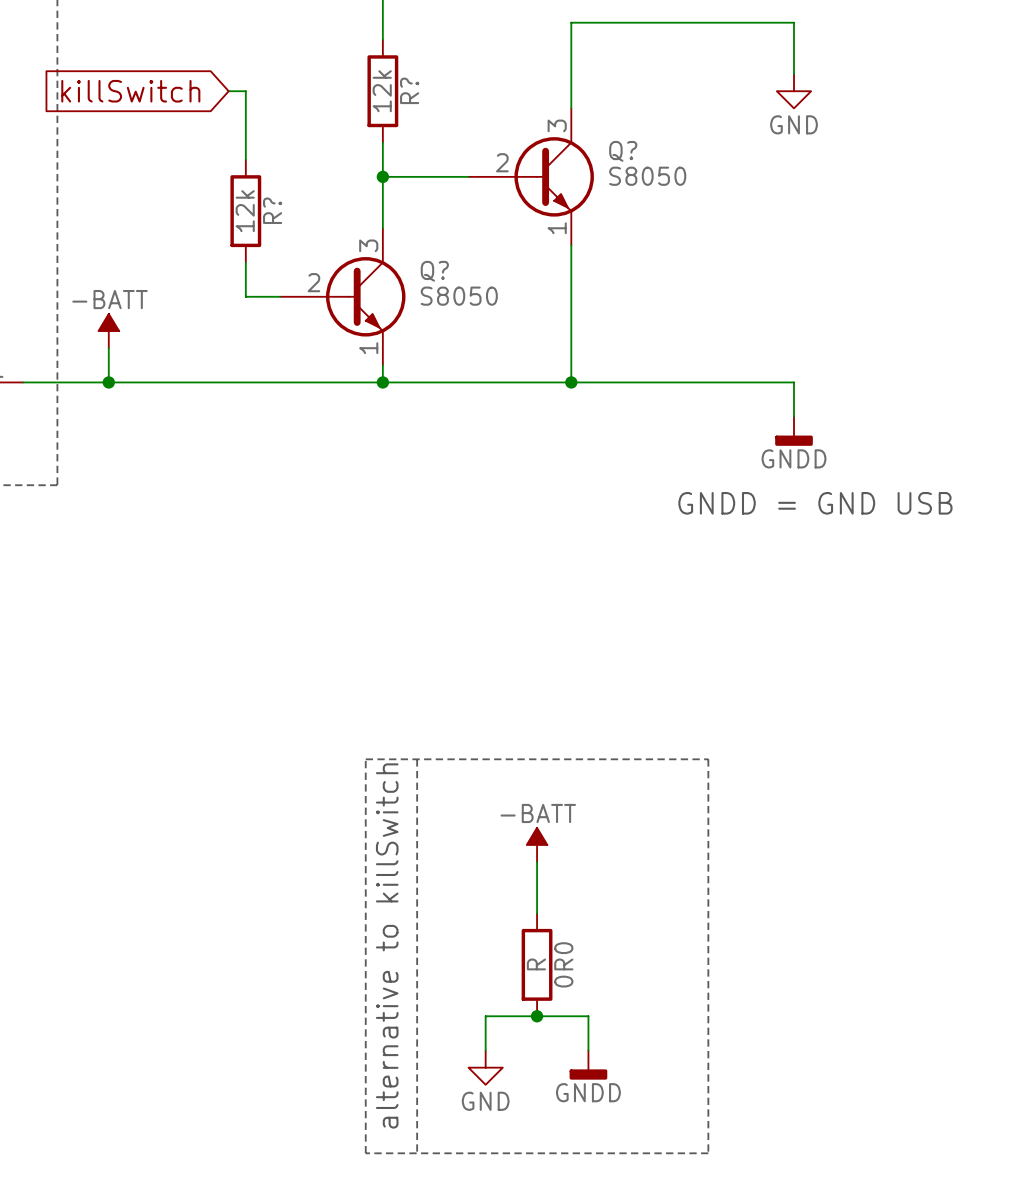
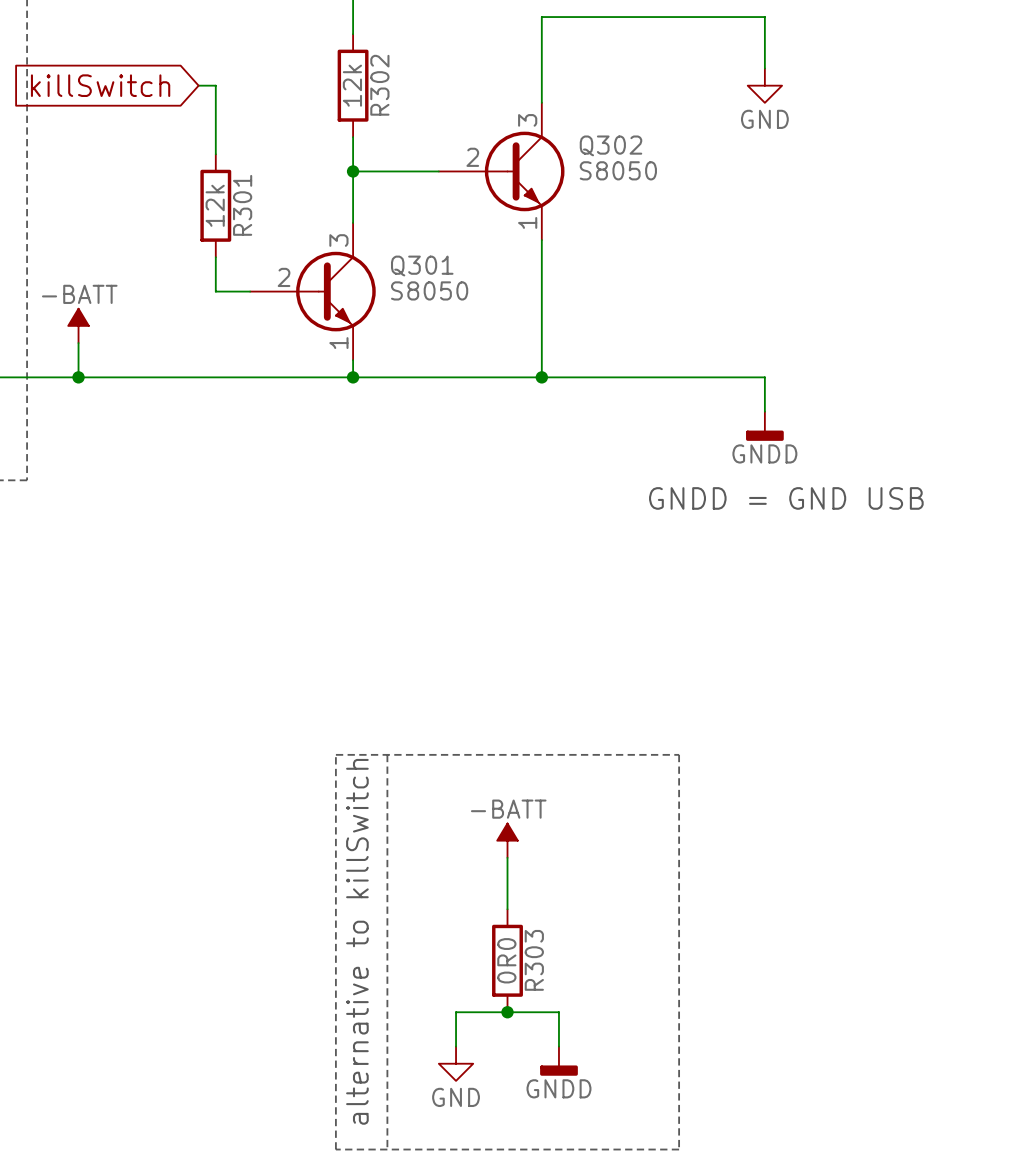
R? name: R? (409, 90) -> R302 (379, 85)
Q? name: Q? (623, 151) -> Q302 (611, 145)
R? name: R? (272, 210) -> R301 (242, 205)
Q? name: Q? (434, 271) -> Q301 (422, 266)
0R0 value: R (536, 964) -> 0R0 (506, 960)
0R0 name: 0R0 (563, 964) -> R303 (534, 960)

